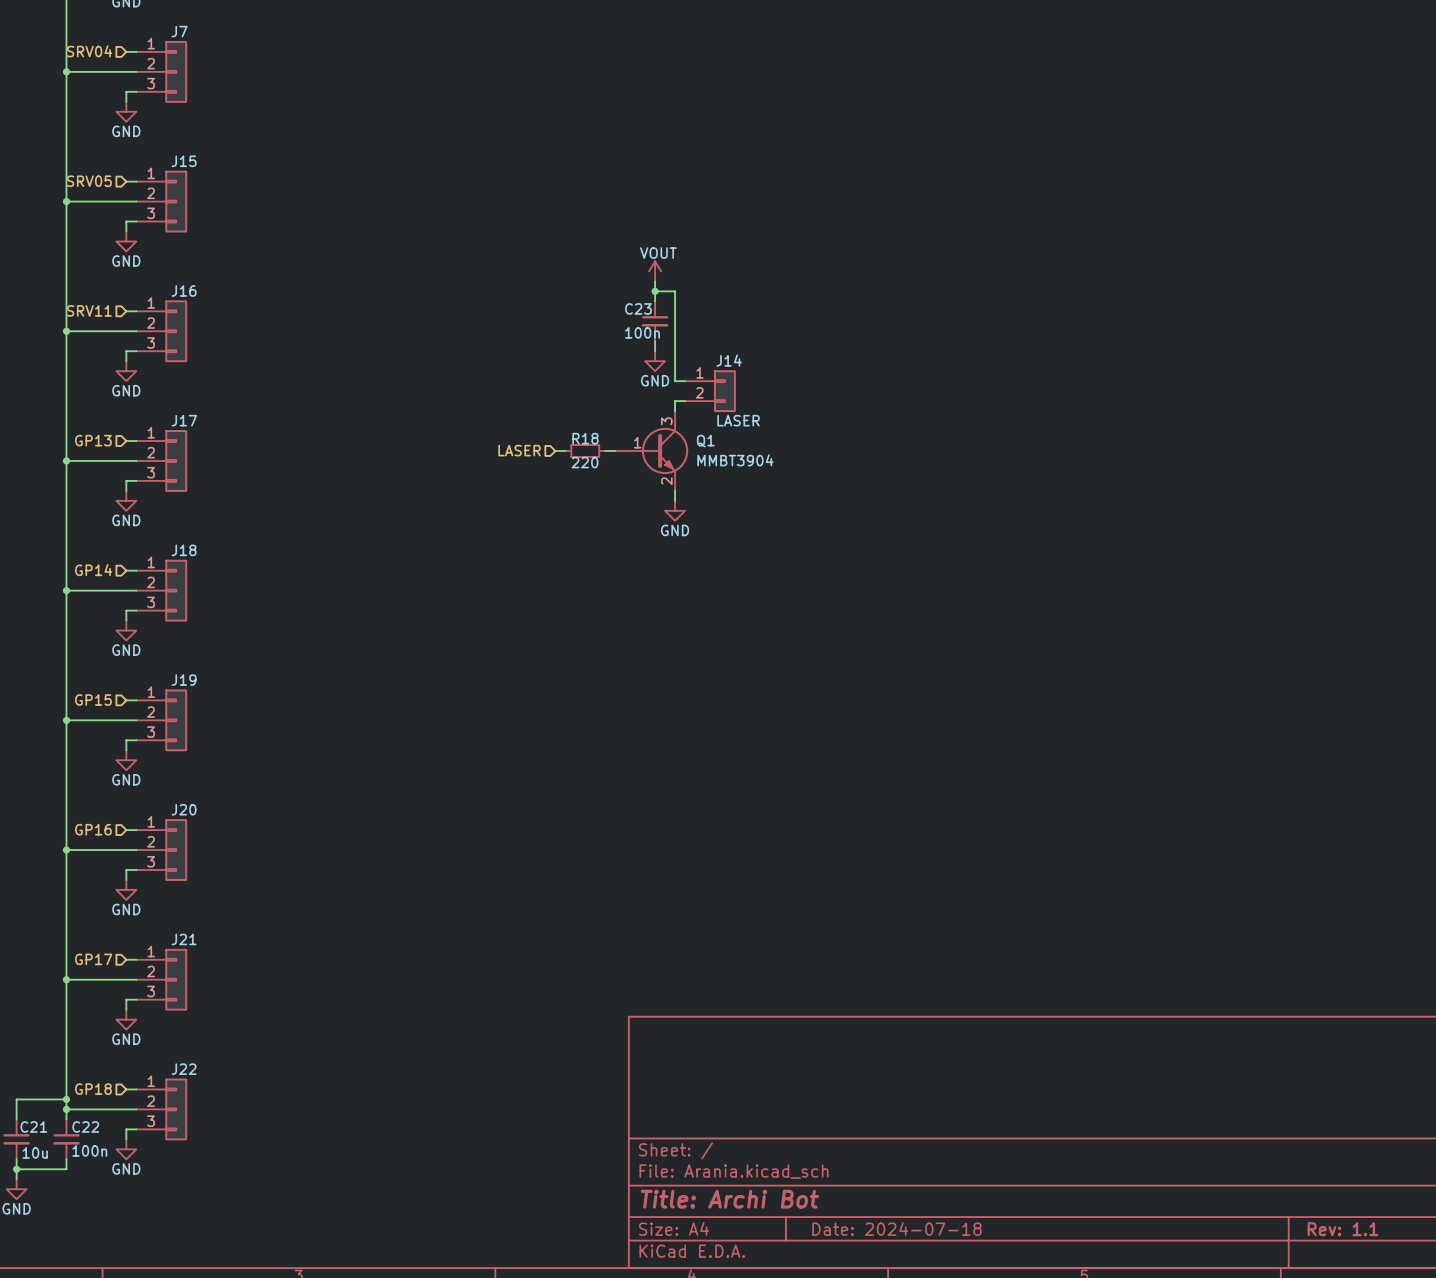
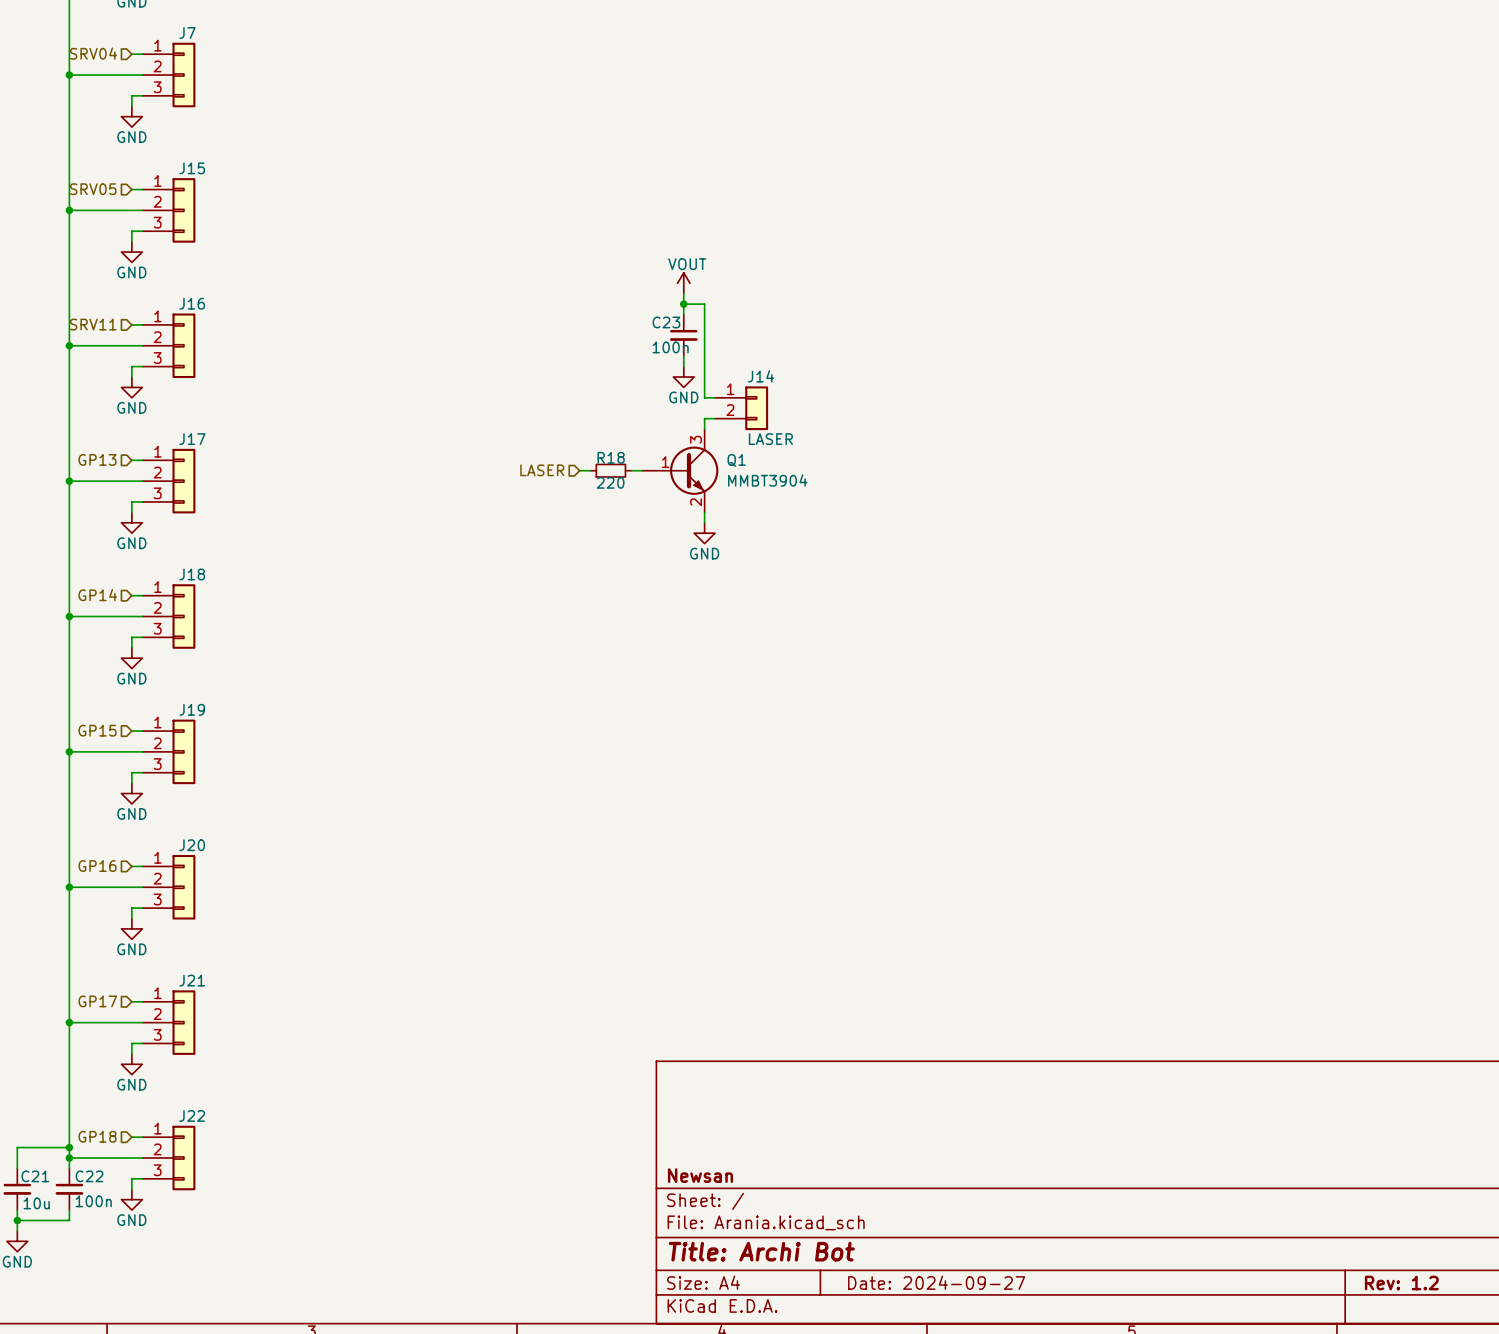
title block: none -> Newsan (700, 1175)
title block: Date: 2024-07-18 (897, 1228) -> Date: 2024-09-27 (936, 1282)
title block: Rev: 1.1 (1343, 1229) -> Rev: 1.2 (1401, 1283)

